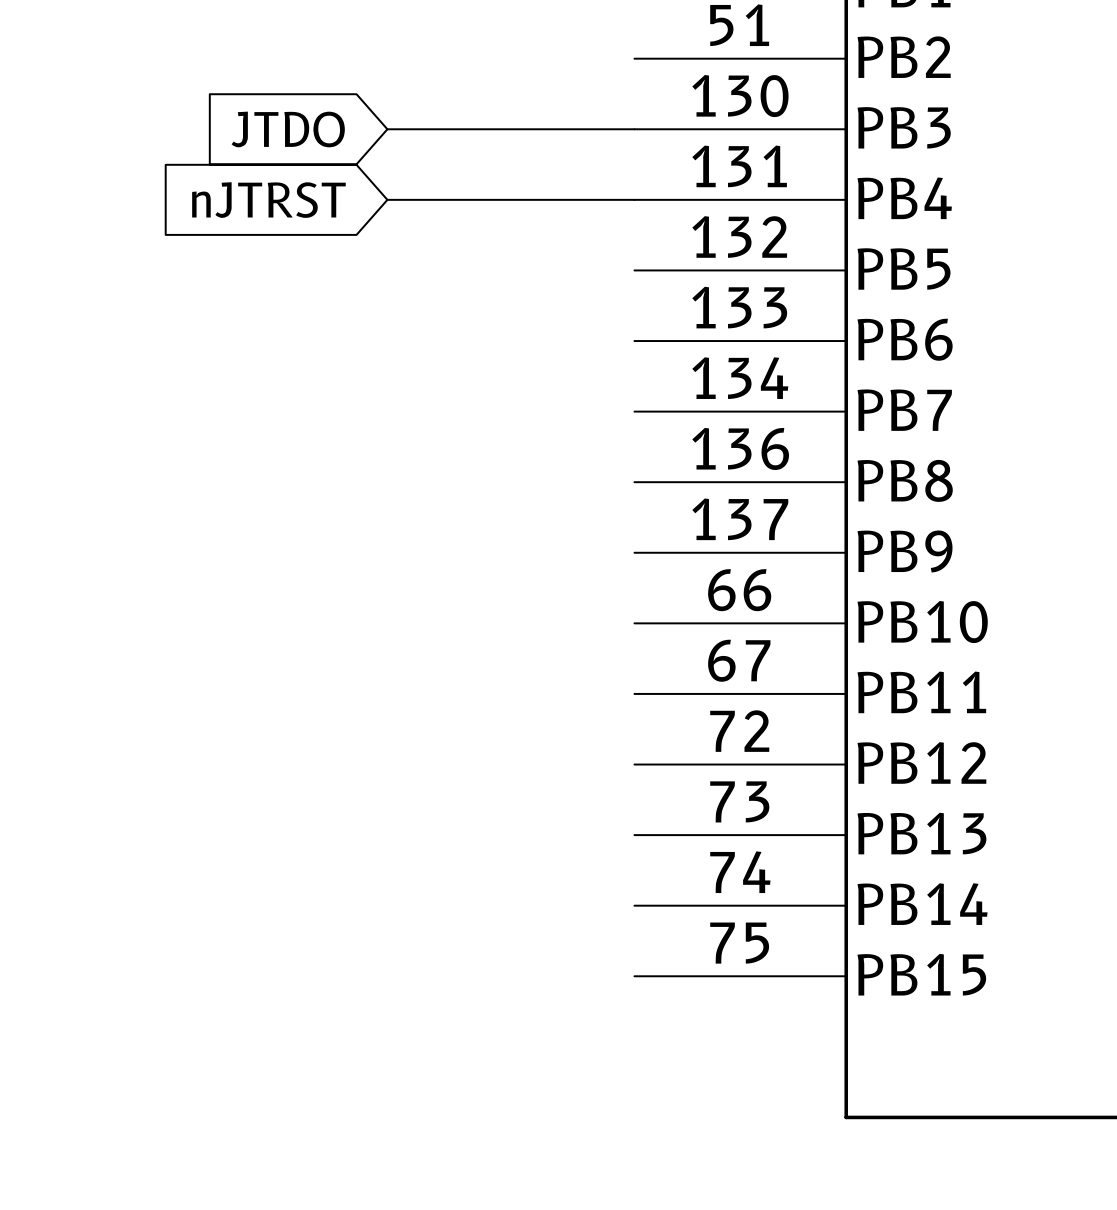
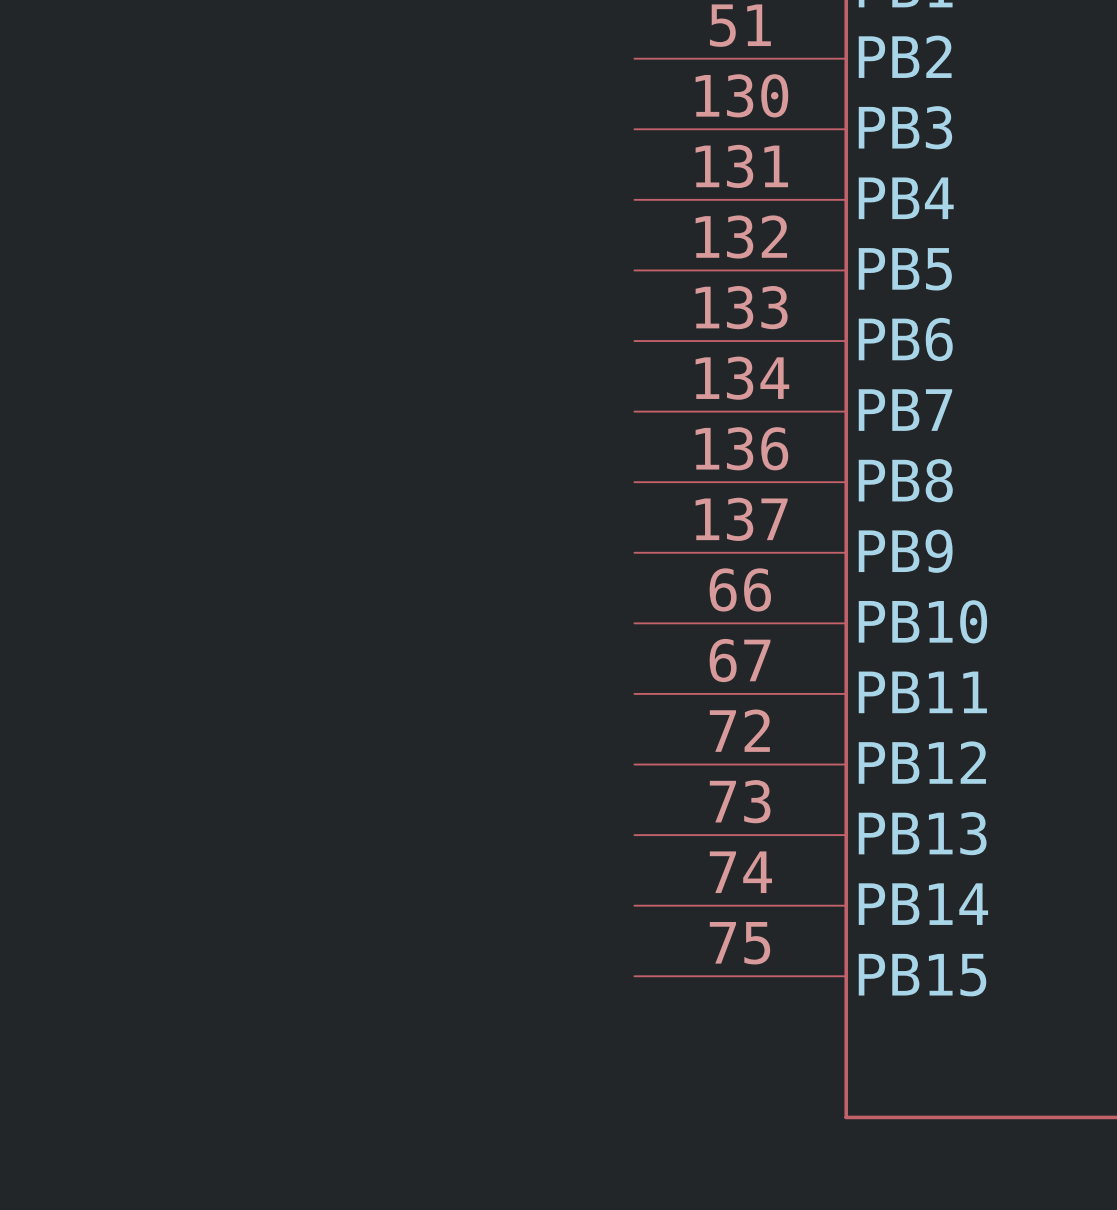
global label: JTDO (288, 129) -> none
wire: (387, 129) (634, 129) -> none
wire: (387, 199) (634, 199) -> none
global label: nJTRST (268, 200) -> none

